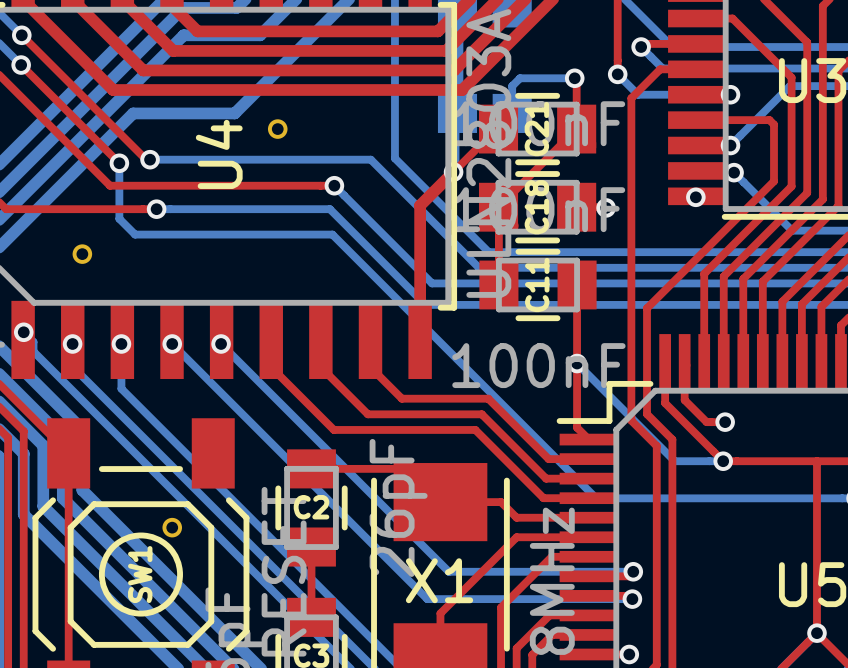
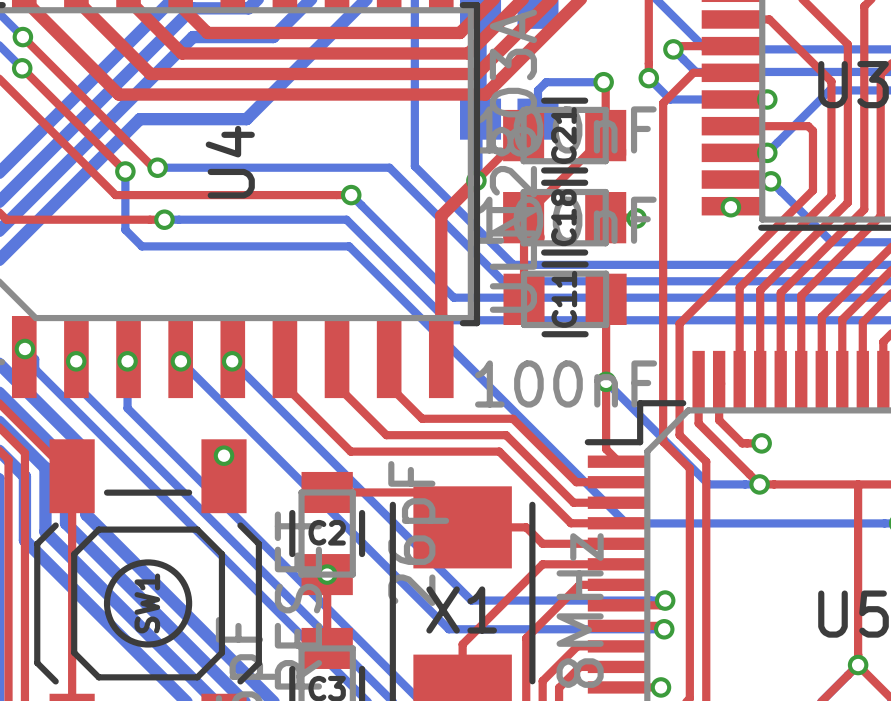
part: (277, 129) -> none
part: (82, 254) -> none
via: none -> (224, 455)
part: (172, 527) -> none
via: none -> (327, 574)

